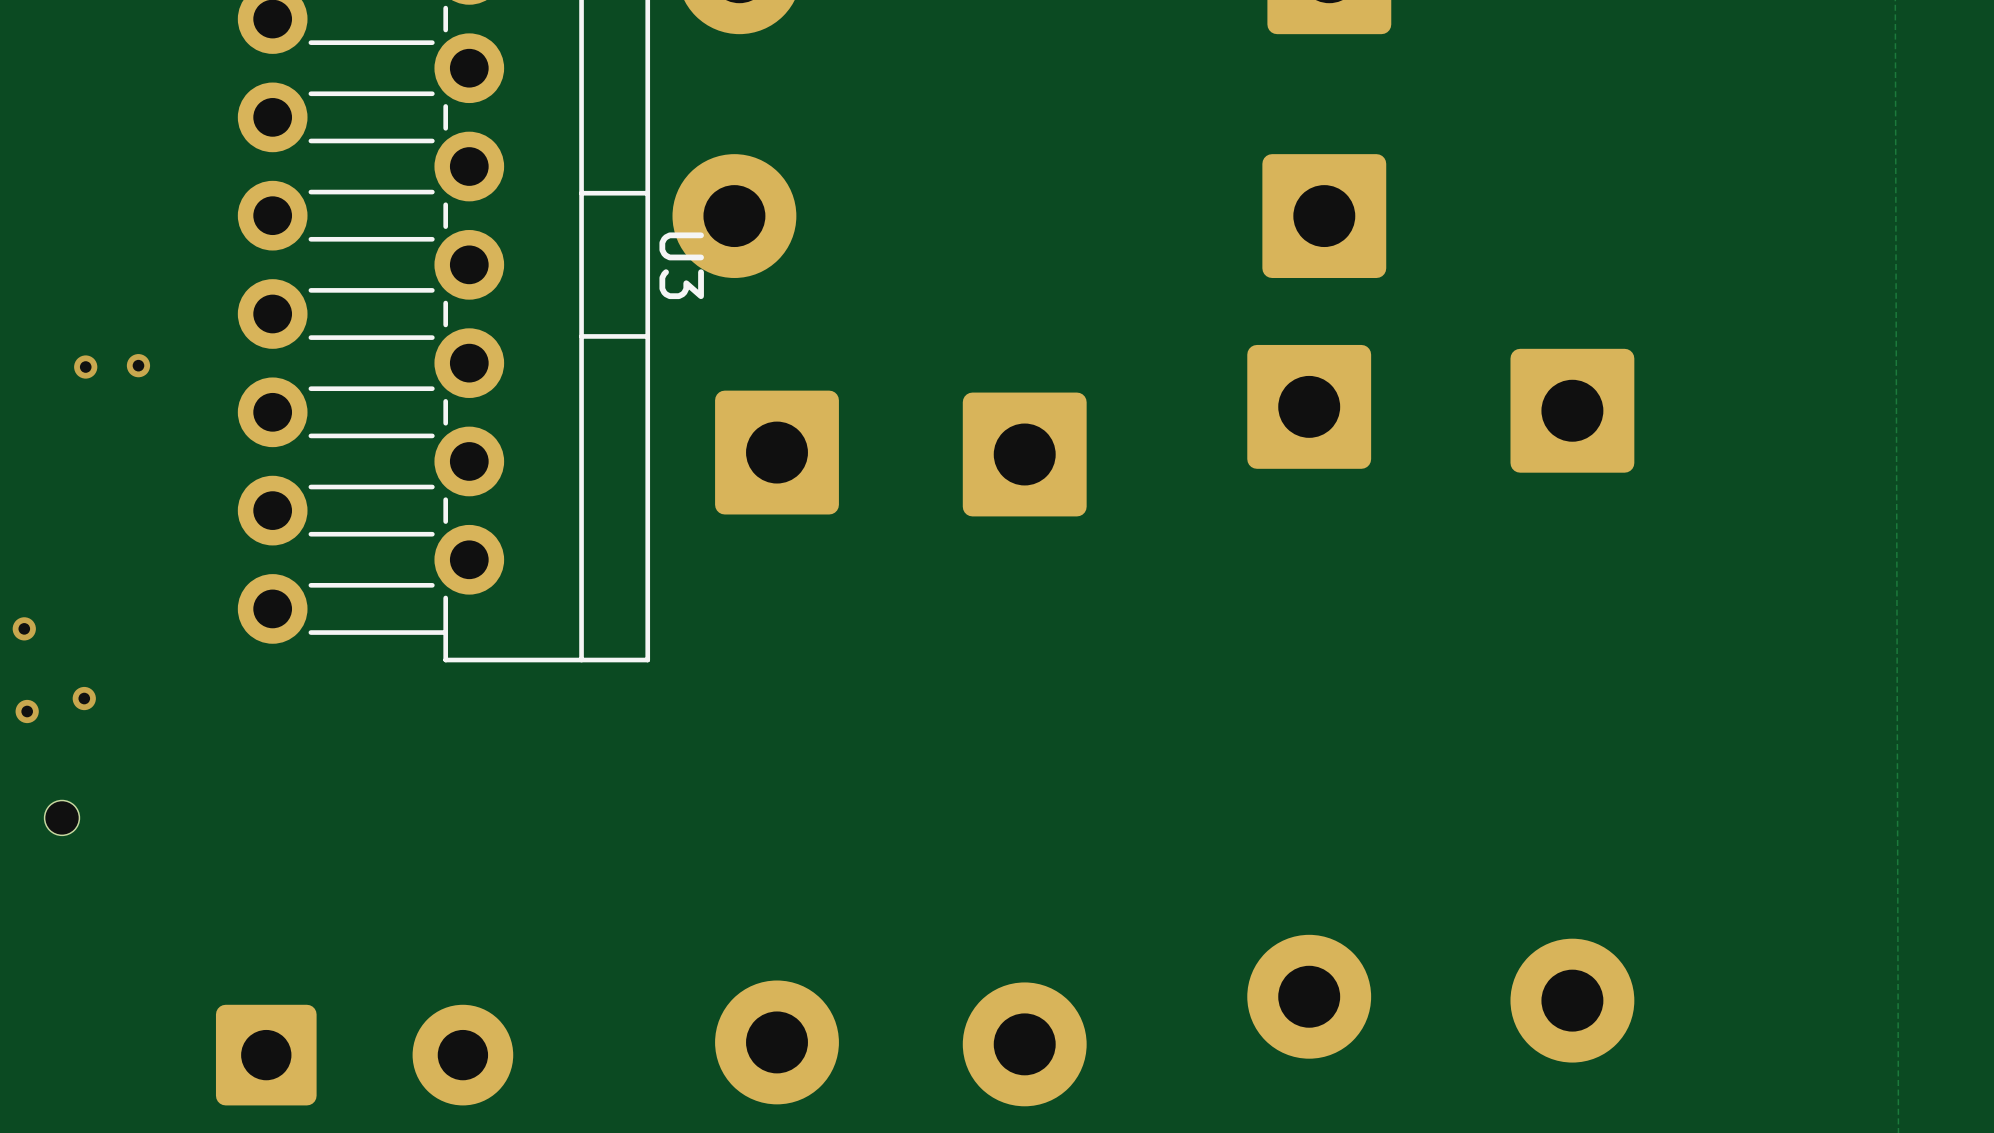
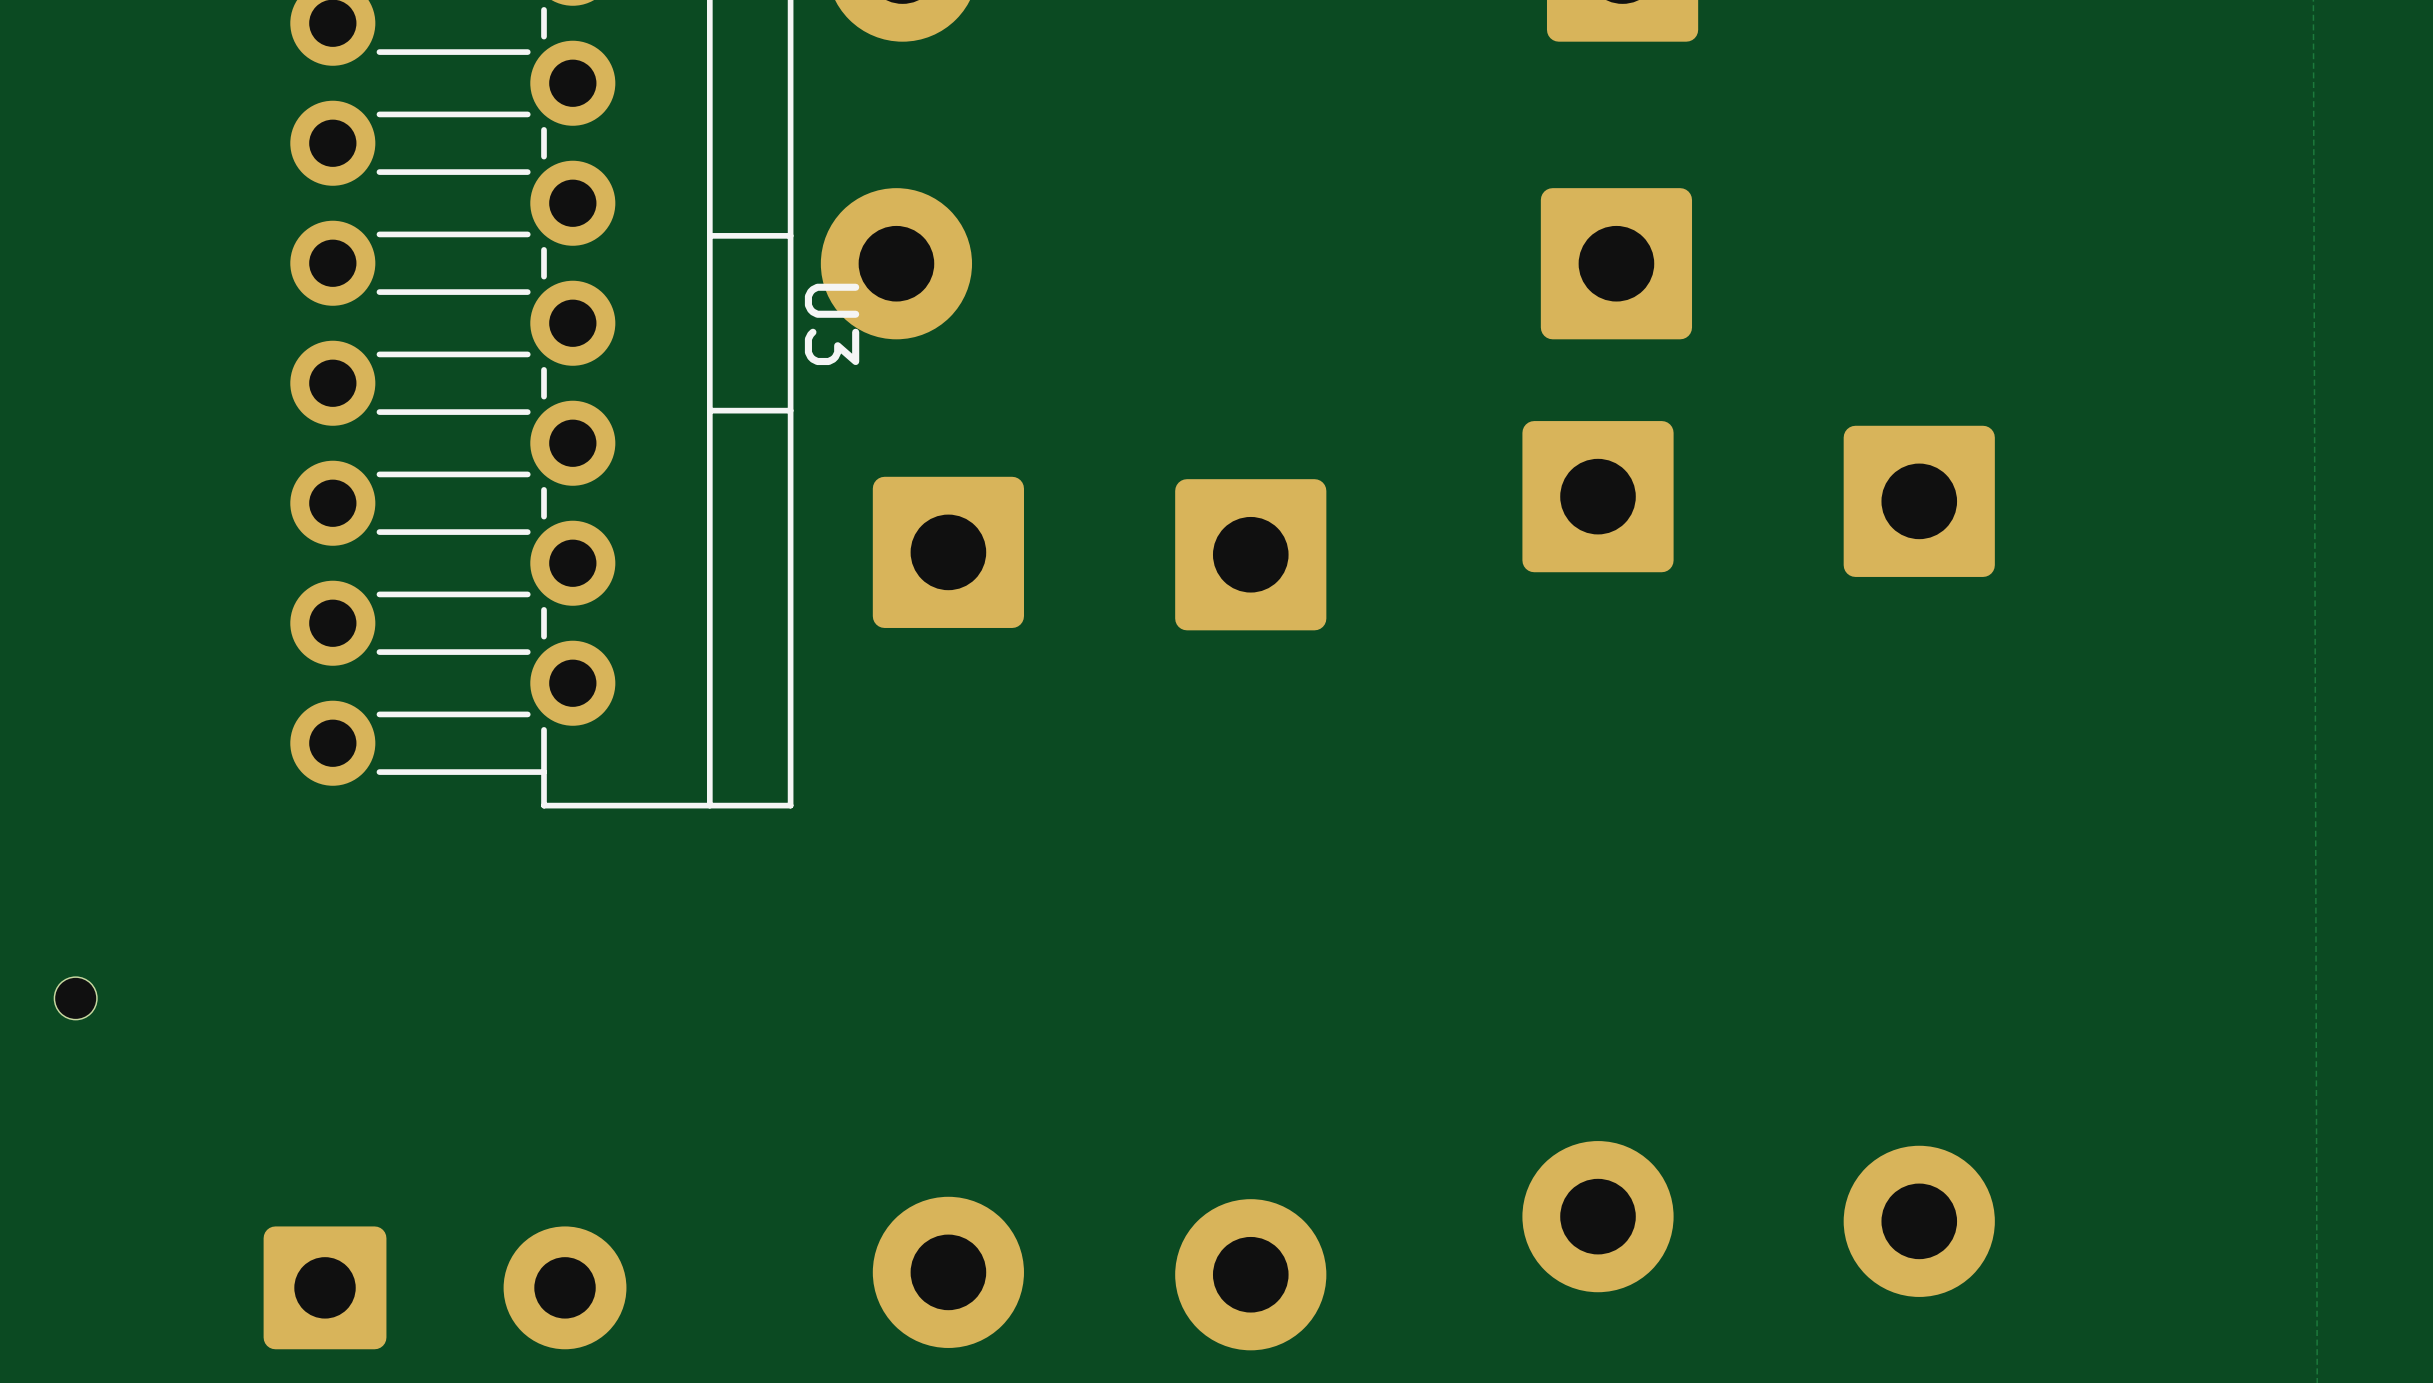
via: (138, 365) -> none
via: (85, 367) -> none
via: (24, 628) -> none
via: (84, 698) -> none
via: (27, 711) -> none

